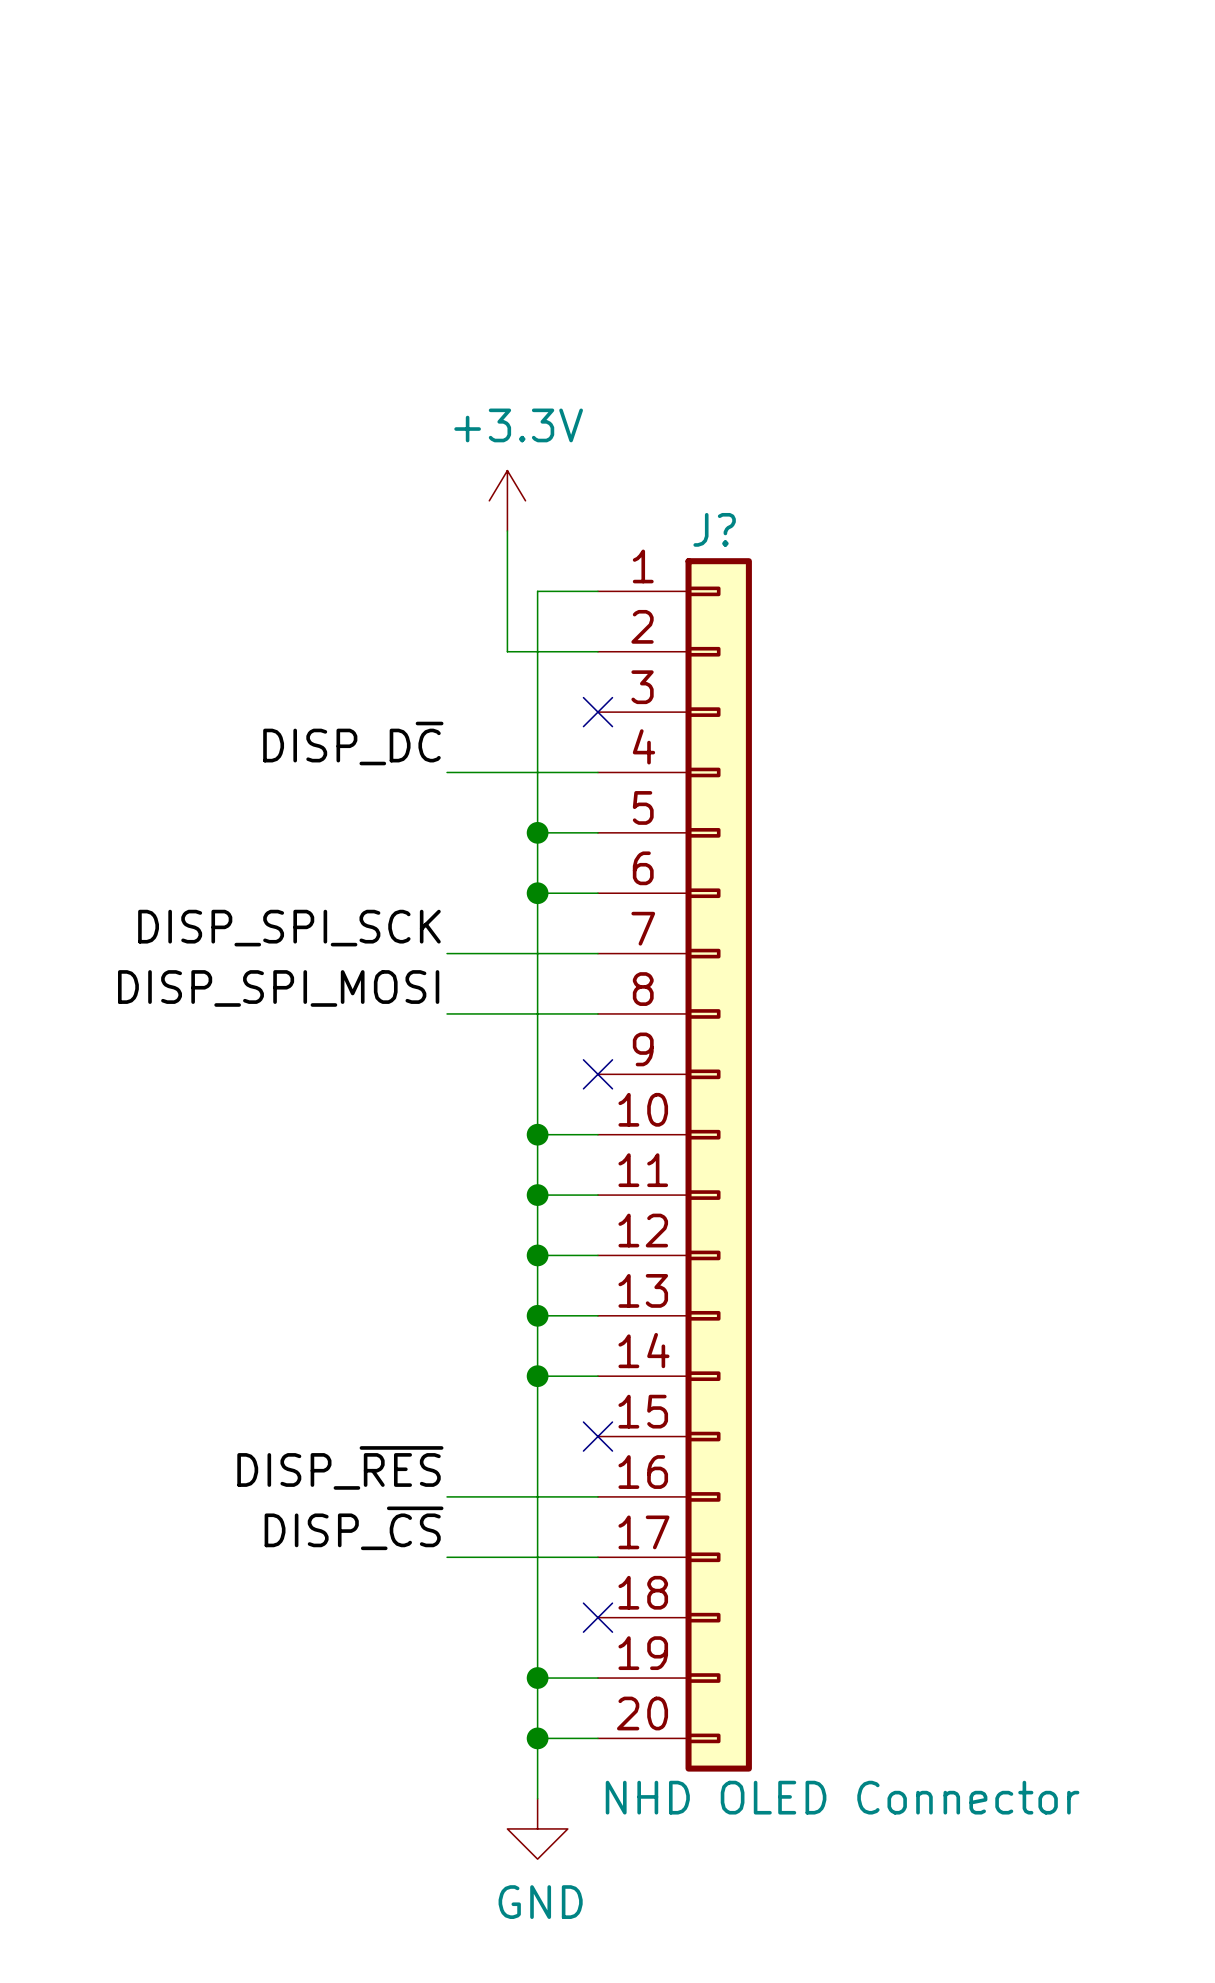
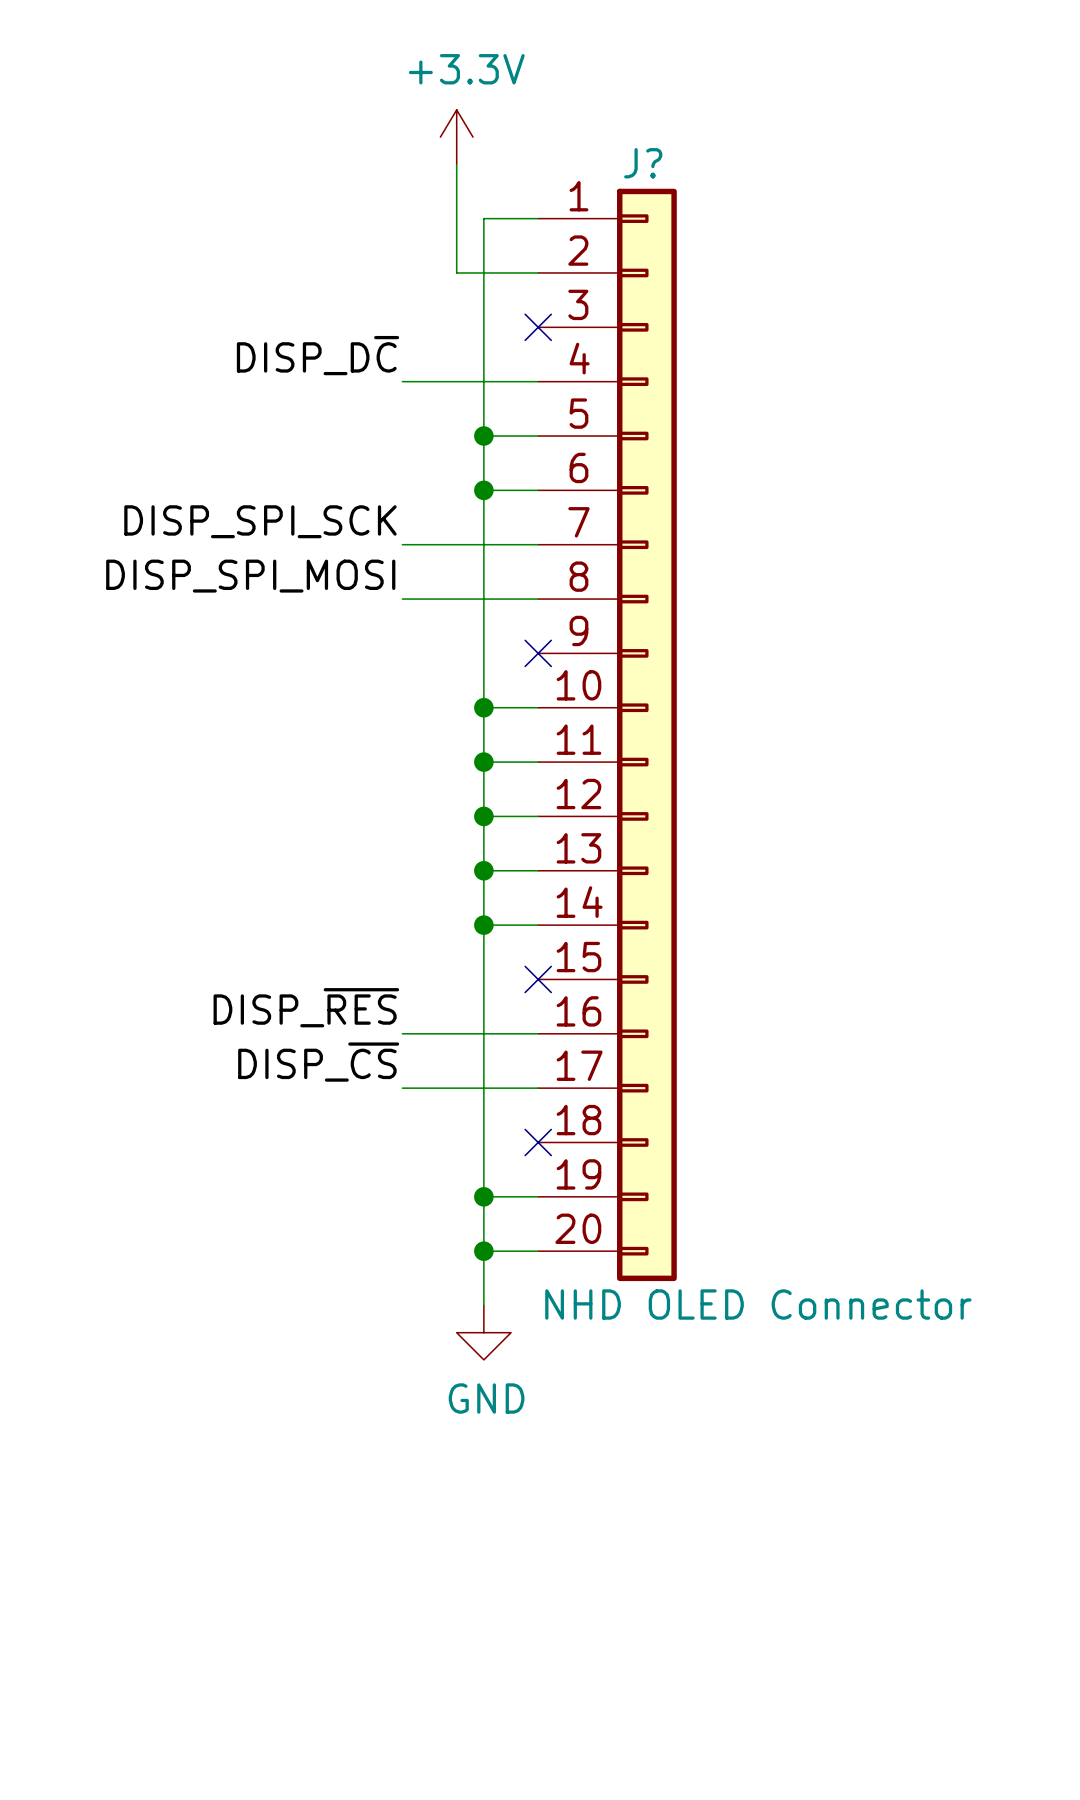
wire: none -> (456, 164) (456, 272) (538, 272)
wire: none -> (538, 218) (483, 218) (483, 544) (402, 544)
no-connect mark: none -> (538, 327)
wire: none -> (402, 381) (538, 381)
wire: none -> (483, 436) (538, 436)
junction: none -> (483, 436)
power symbol position: +3.3V (507, 500) -> +3.3V (456, 137)
wire: (507, 531) (507, 651) -> (402, 599) (456, 599)
wire: none -> (483, 490) (538, 490)
junction: none -> (483, 490)
label position: DISP_D~{C} (353, 743) -> DISP_D~{C} (317, 355)
wire: (447, 772) (537, 772) -> none
junction: none -> (483, 707)
label position: DISP_SPI_SCK (289, 928) -> DISP_SPI_SCK (260, 521)
wire: (447, 953) (537, 953) -> (402, 1033) (483, 1033)
junction: none -> (483, 870)
label position: DISP_SPI_MOSI (278, 988) -> DISP_SPI_MOSI (250, 576)
wire: (447, 1013) (537, 1013) -> (402, 1088) (483, 1088)
junction: none -> (483, 925)
junction: (537, 1134) -> none
J? position: (674, 1164) -> (607, 734)
junction: (537, 1195) -> none
wire: (537, 1255) (597, 1255) -> none
junction: (537, 1255) -> none
no-connect mark: none -> (538, 1142)
wire: (537, 1436) (537, 1798) -> none
no-connect mark: (597, 1436) -> none
label position: DISP_~{RES} (340, 1467) -> DISP_~{RES} (306, 1007)
wire: (447, 1496) (597, 1496) -> none
label position: DISP_~{CS} (354, 1528) -> DISP_~{CS} (318, 1062)
wire: (447, 1557) (597, 1557) -> none
no-connect mark: (597, 1617) -> none
wire: (537, 1678) (597, 1678) -> none
junction: (537, 1678) -> none
wire: (537, 1738) (597, 1738) -> none
junction: (537, 1738) -> none
power symbol position: GND (537, 1828) -> GND (483, 1332)

